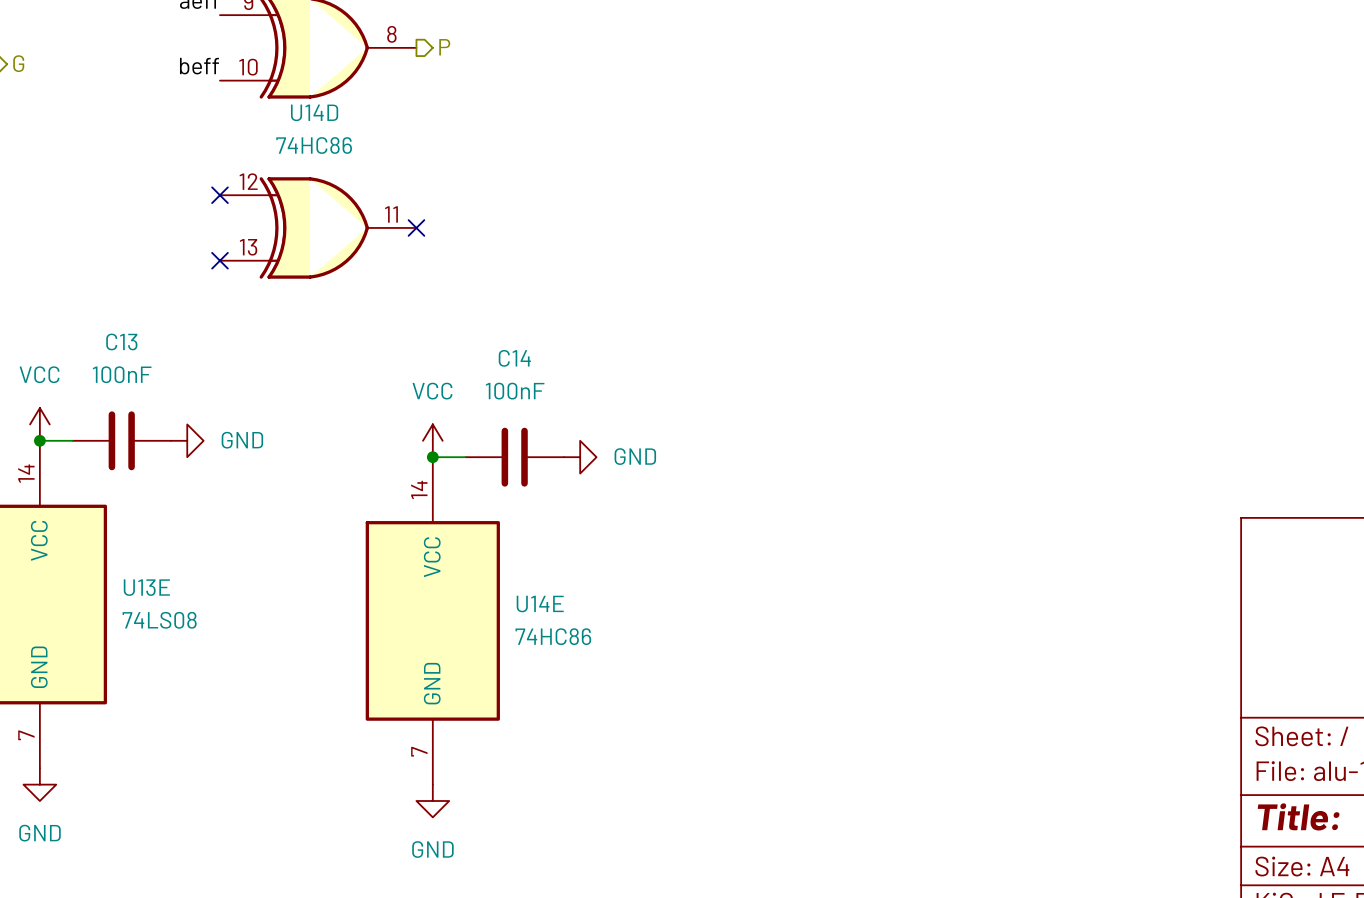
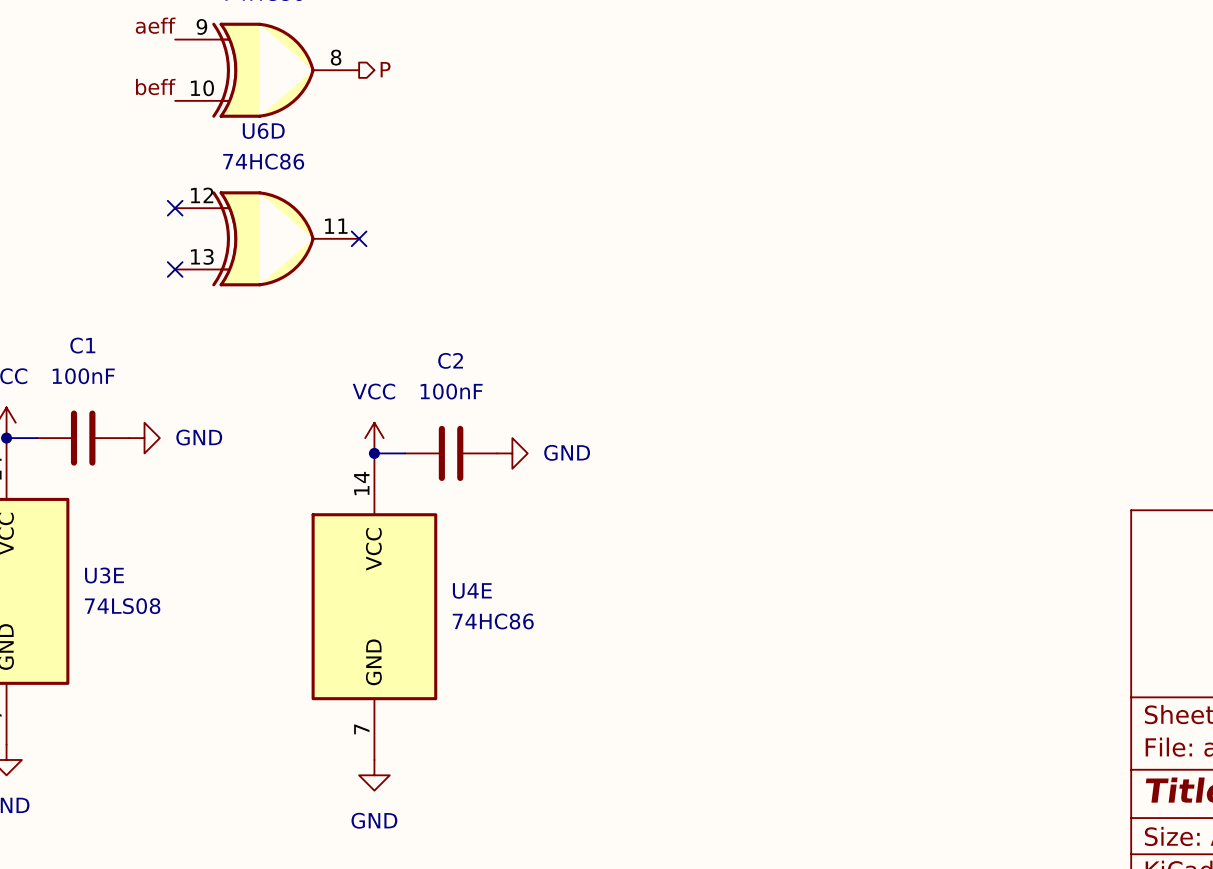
U14D name: U14D (314, 112) -> U6D (263, 130)
C13 name: C13 (121, 341) -> C1 (82, 345)
C14 name: C14 (514, 358) -> C2 (450, 360)
U13E name: U13E (146, 587) -> U3E (104, 575)
U14E name: U14E (540, 604) -> U4E (472, 590)

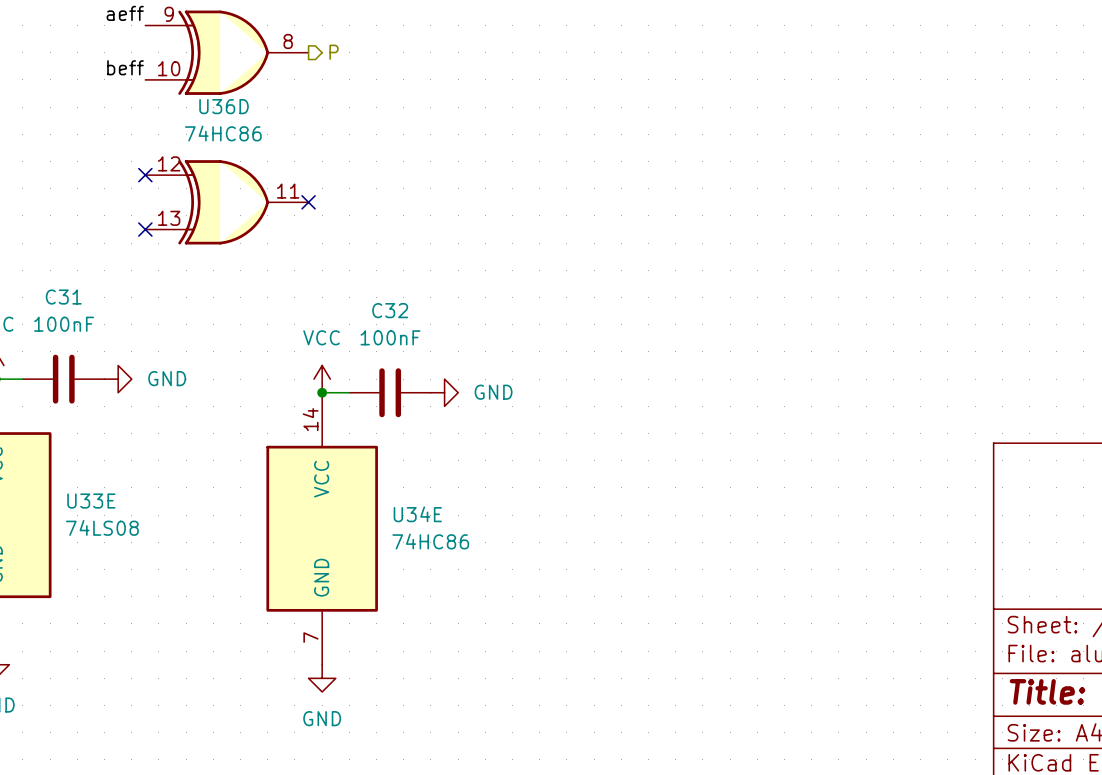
U6D name: U6D (263, 130) -> U36D (224, 106)
C1 name: C1 (82, 345) -> C31 (63, 297)
C2 name: C2 (450, 360) -> C32 (390, 310)
U3E name: U3E (104, 575) -> U33E (91, 501)
U4E name: U4E (472, 590) -> U34E (417, 514)

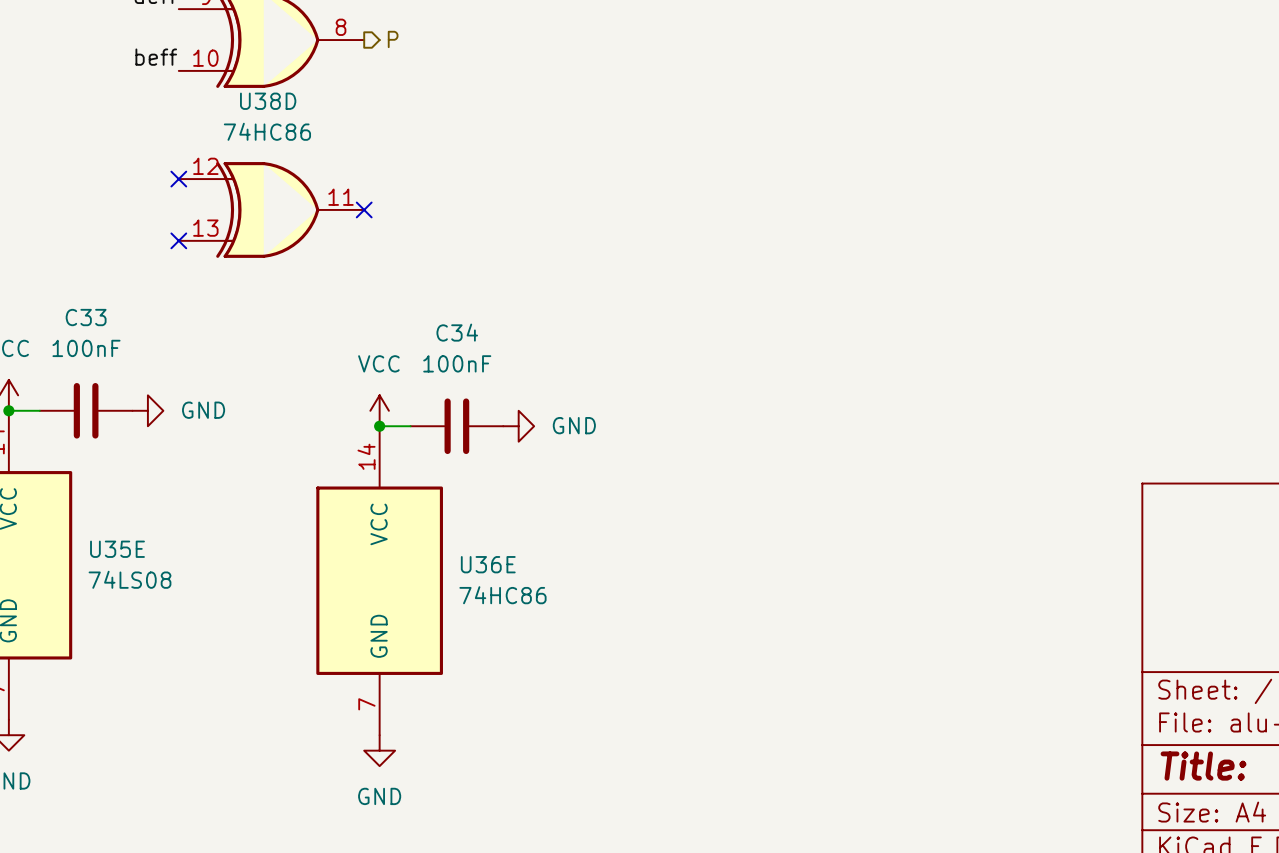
U36D name: U36D (224, 106) -> U38D (268, 101)
C31 name: C31 (63, 297) -> C33 (86, 317)
C32 name: C32 (390, 310) -> C34 (457, 332)
U33E name: U33E (91, 501) -> U35E (117, 549)
U34E name: U34E (417, 514) -> U36E (488, 564)

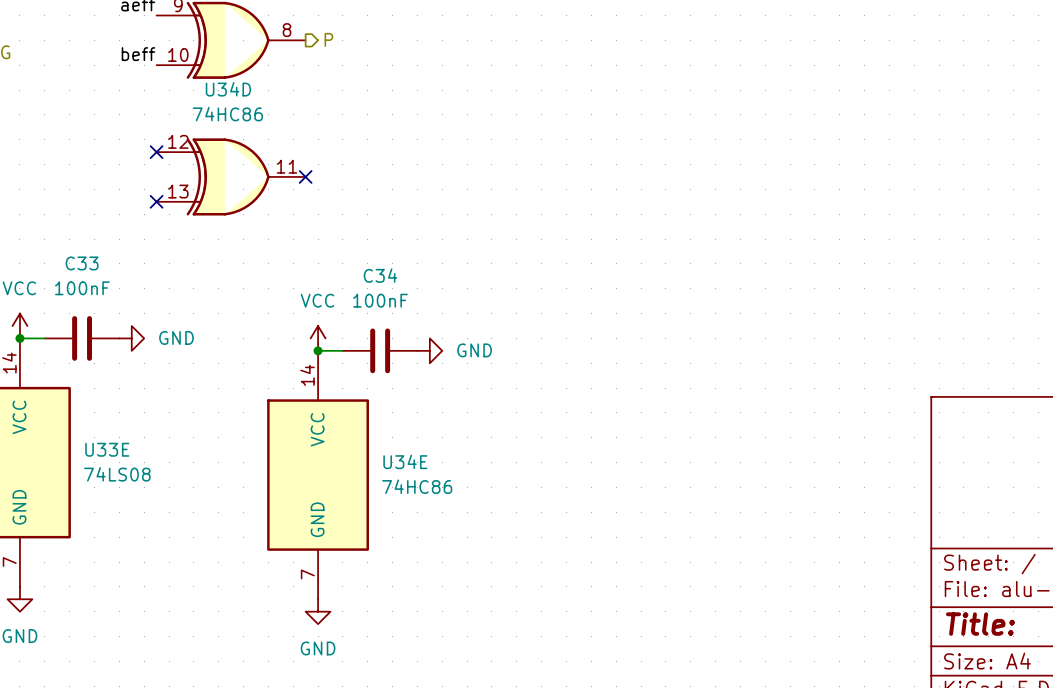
U38D name: U38D (268, 101) -> U34D (228, 89)
U35E name: U35E (117, 549) -> U33E (107, 449)
U36E name: U36E (488, 564) -> U34E (405, 461)

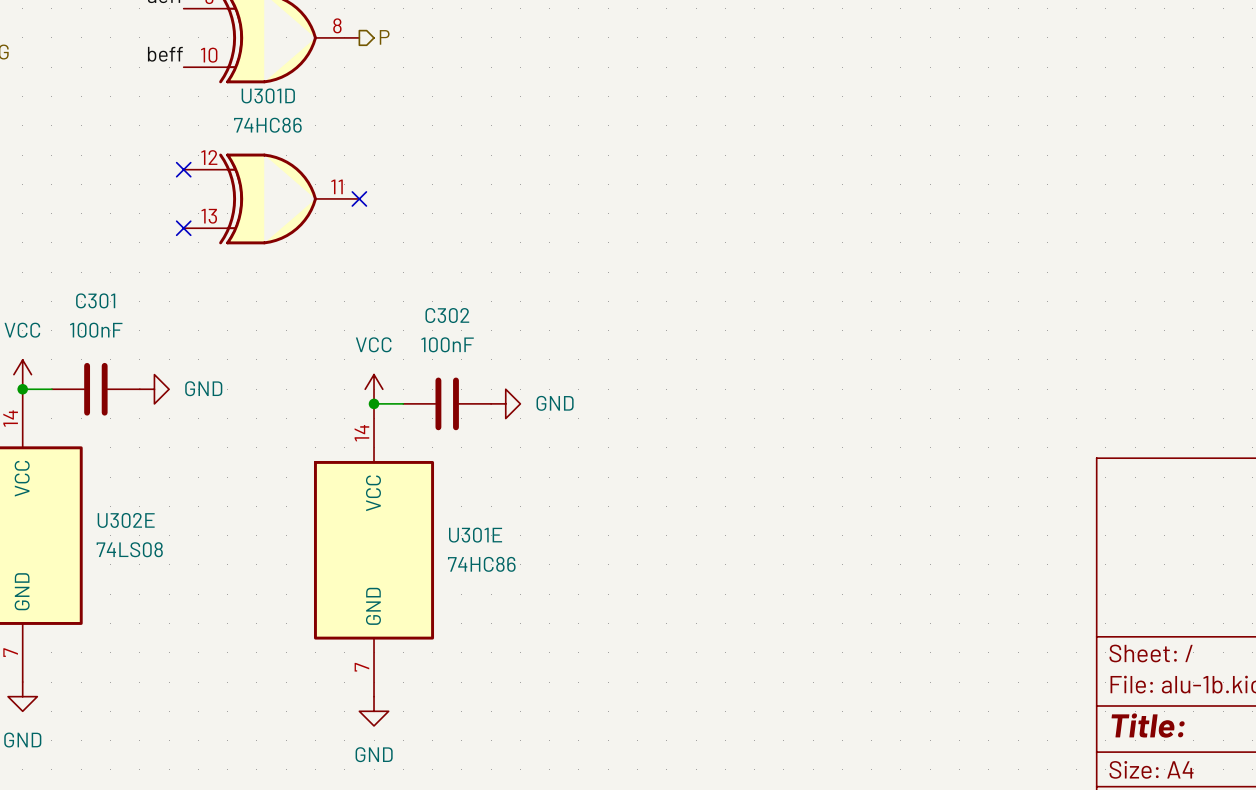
U34D name: U34D (228, 89) -> U301D (268, 95)
C33 name: C33 (82, 263) -> C301 (95, 300)
C34 name: C34 (380, 275) -> C302 (447, 315)
U33E name: U33E (107, 449) -> U302E (126, 520)
U34E name: U34E (405, 461) -> U301E (475, 535)

